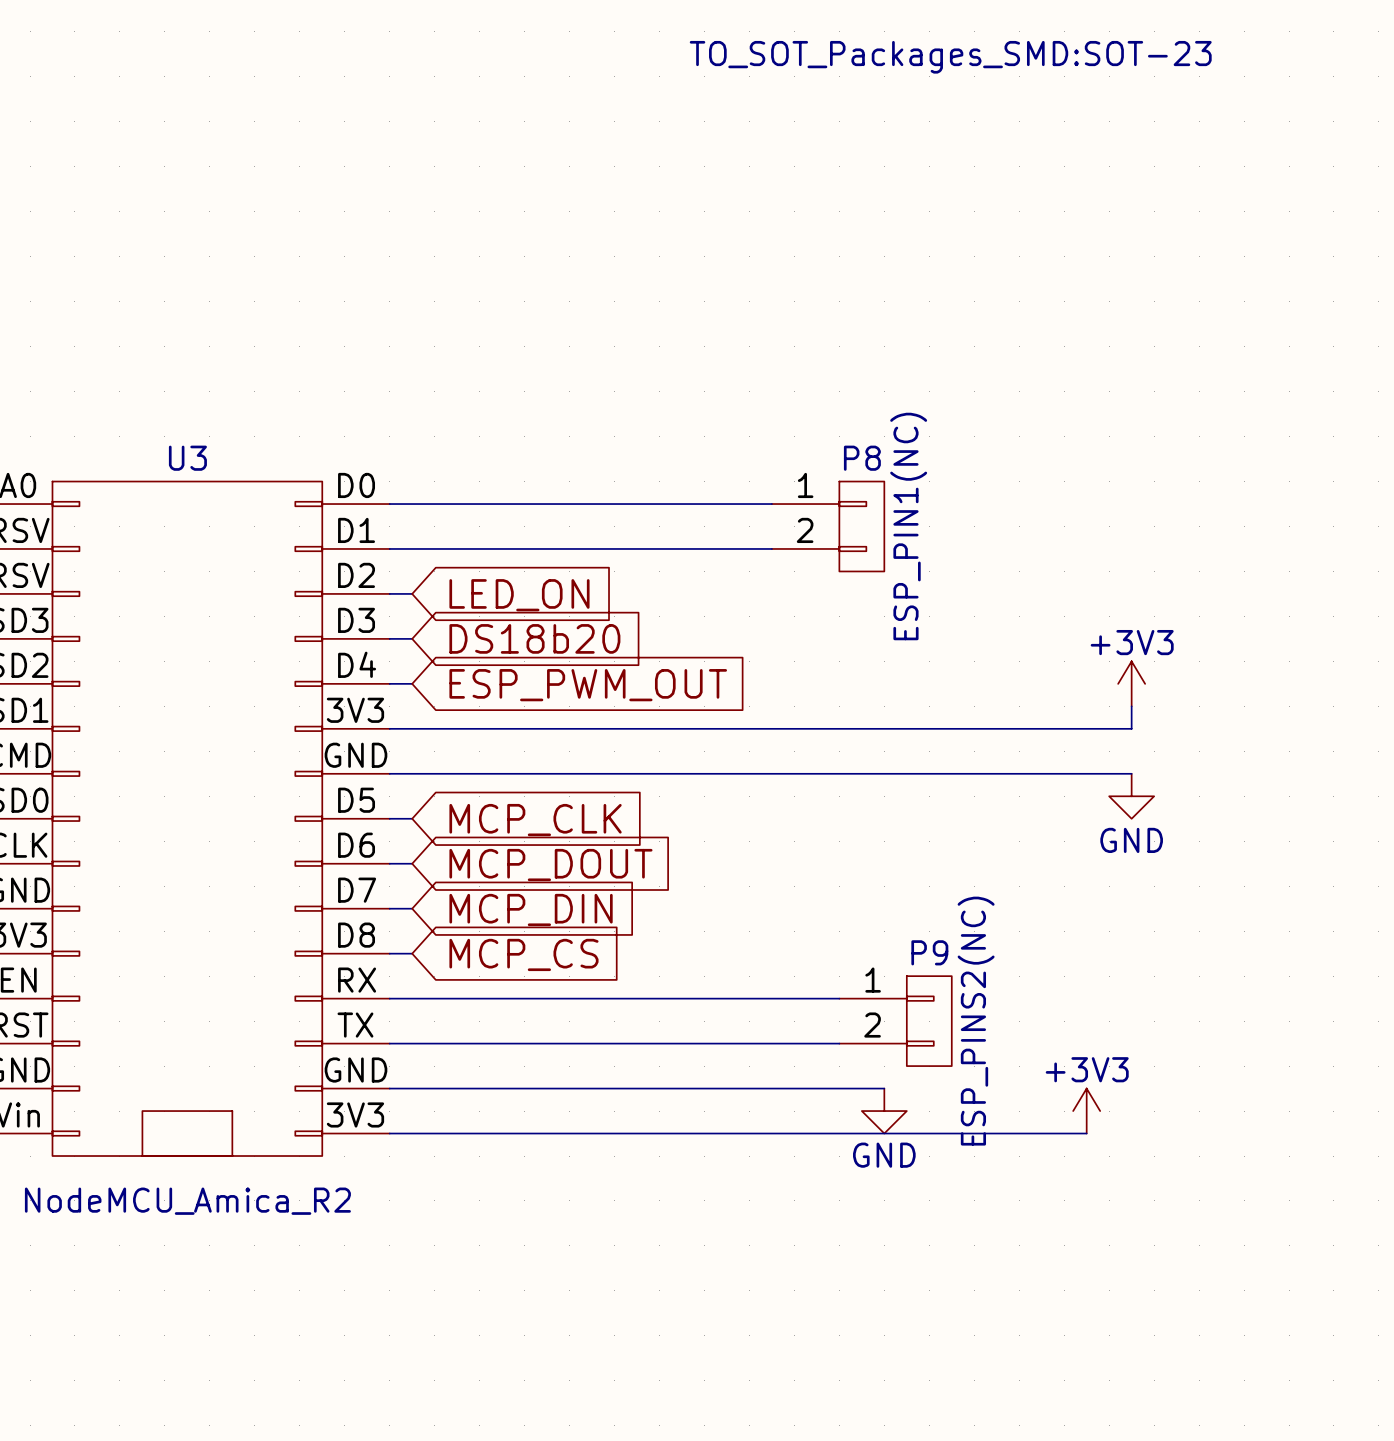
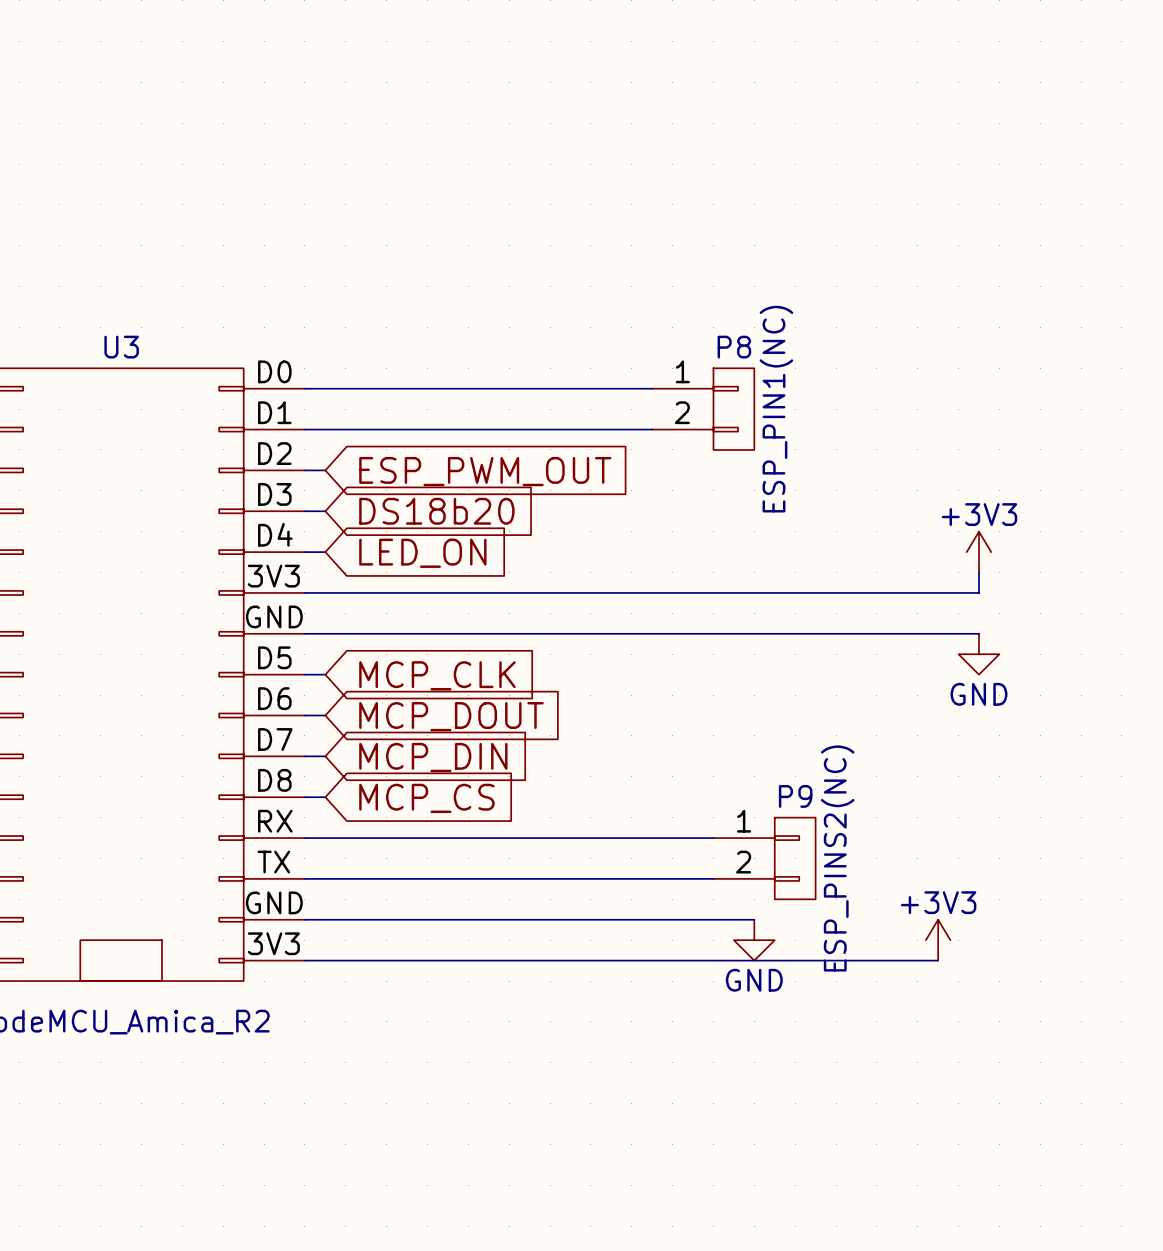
global label: LED_ON (519, 595) -> ESP_PWM_OUT (485, 471)
global label: ESP_PWM_OUT (588, 685) -> LED_ON (422, 553)

